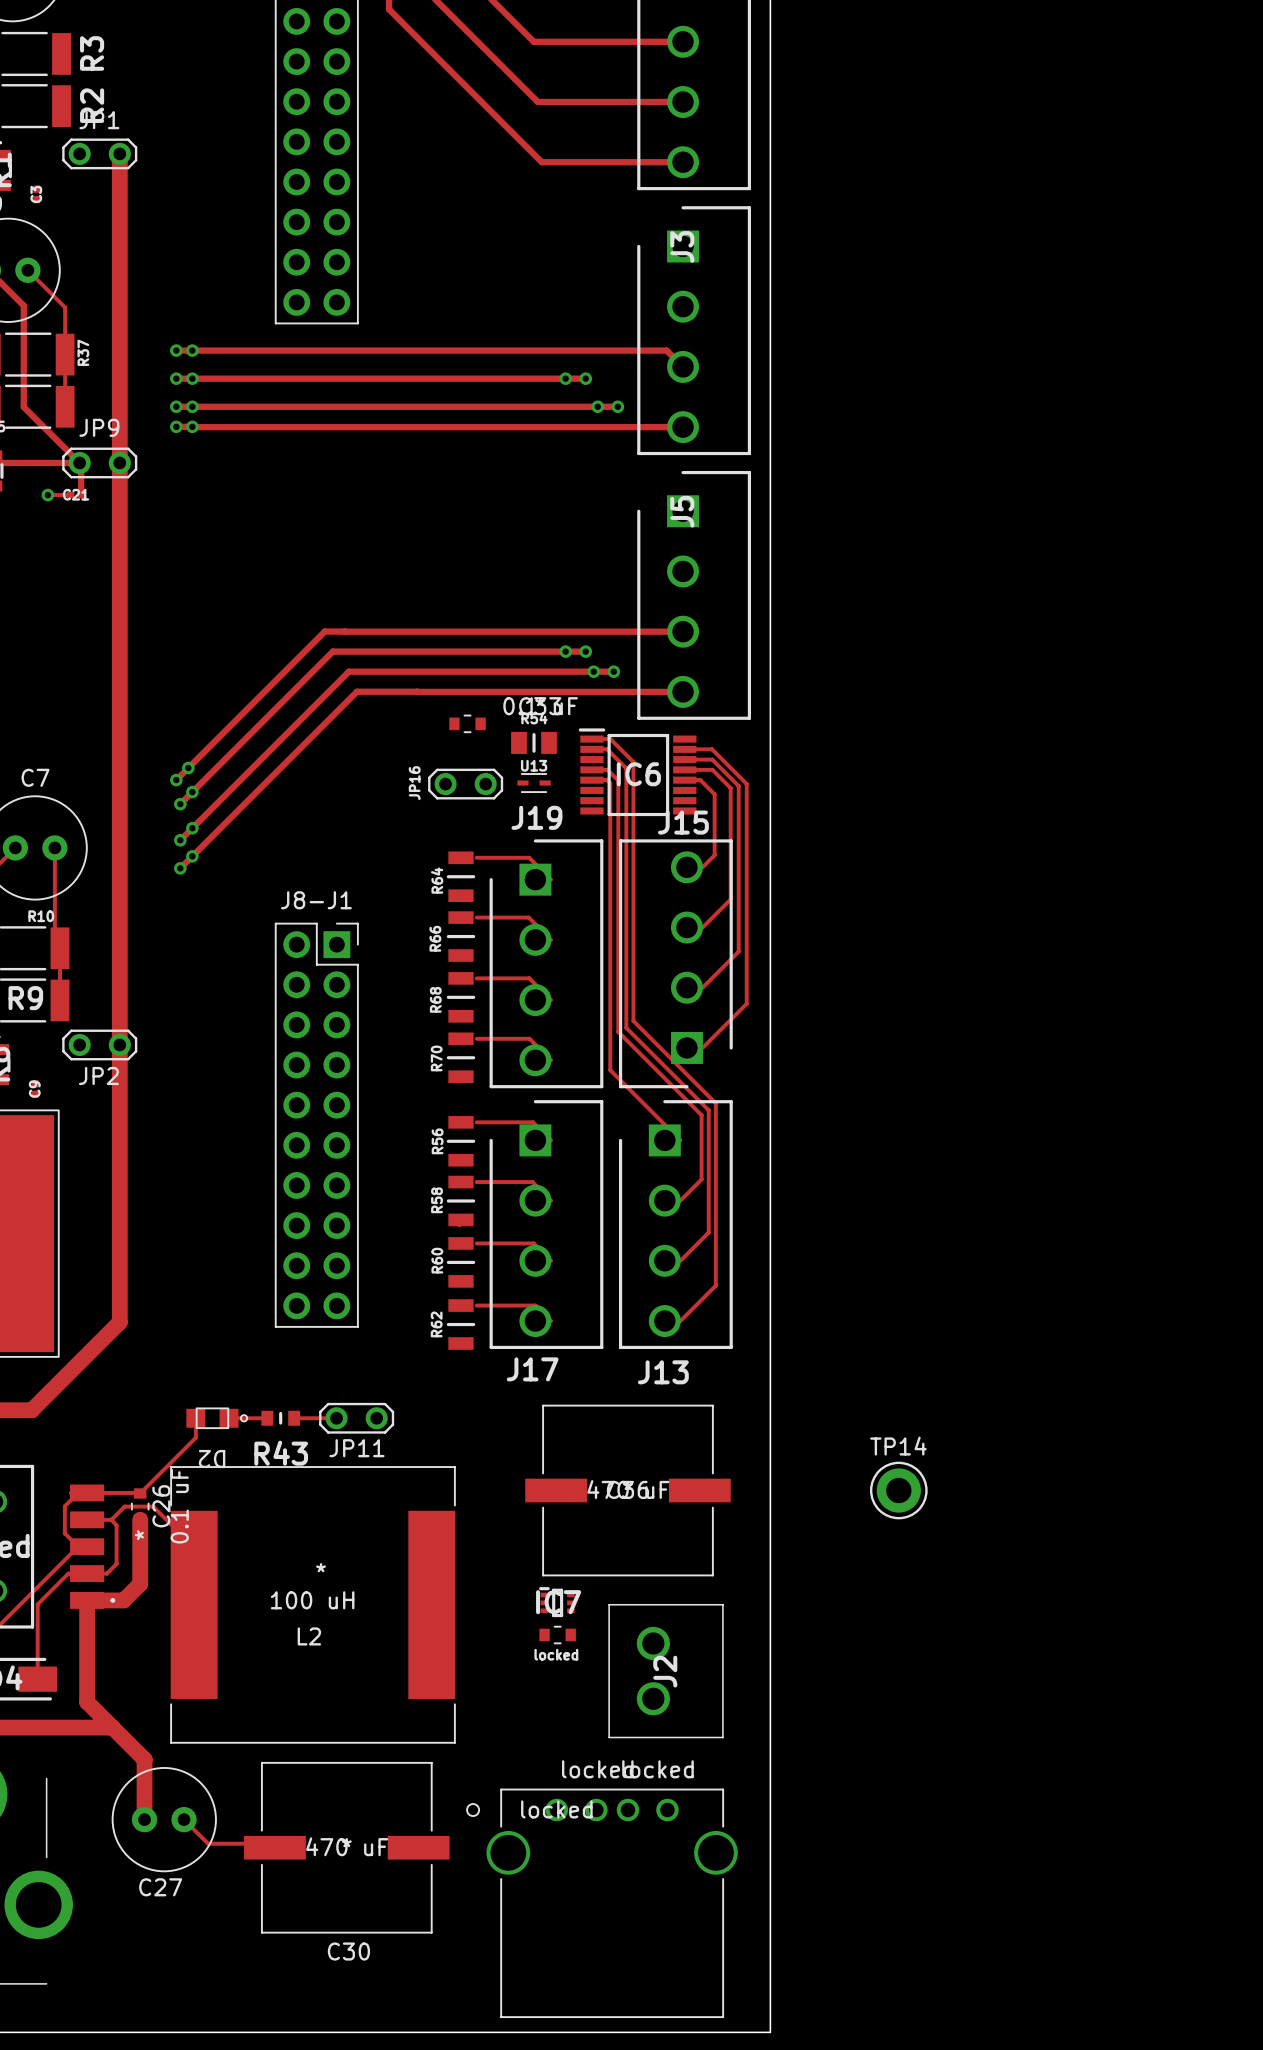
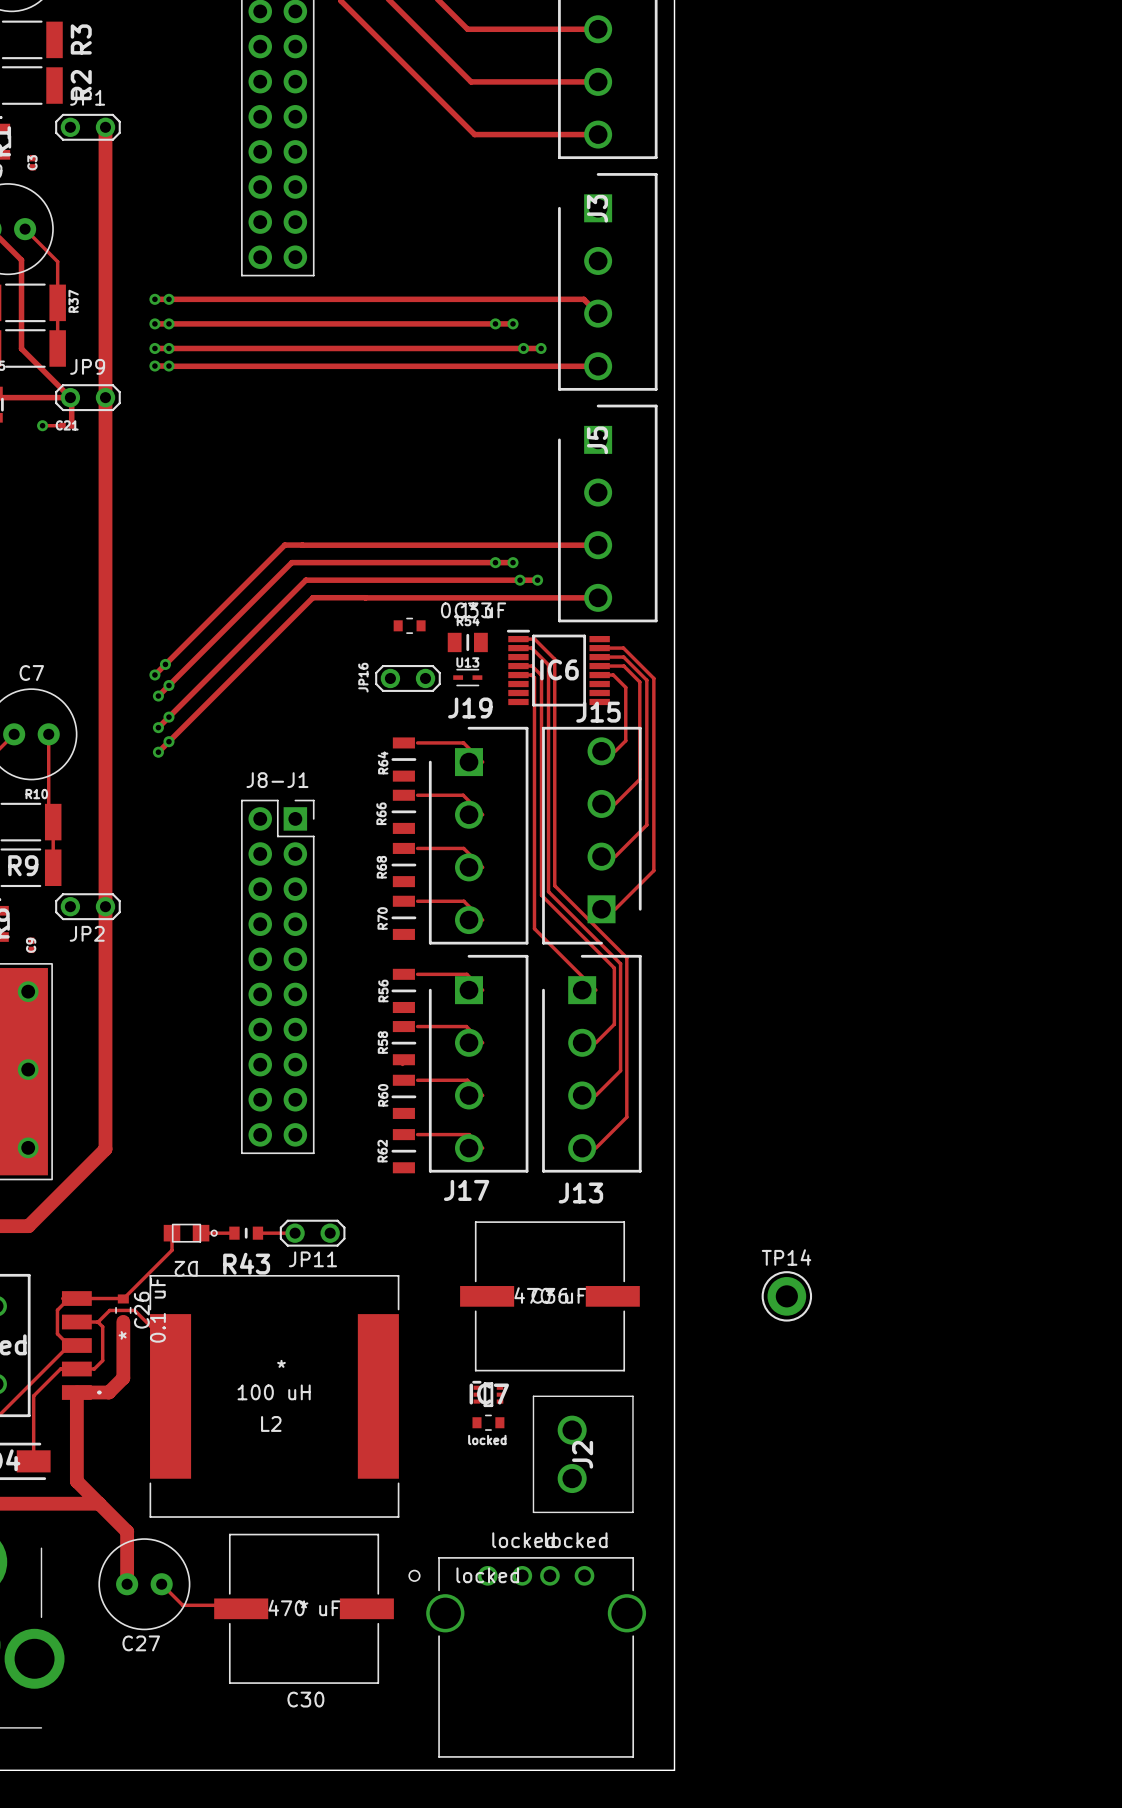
via: none -> (28, 991)
via: none -> (28, 1069)
via: none -> (28, 1147)

